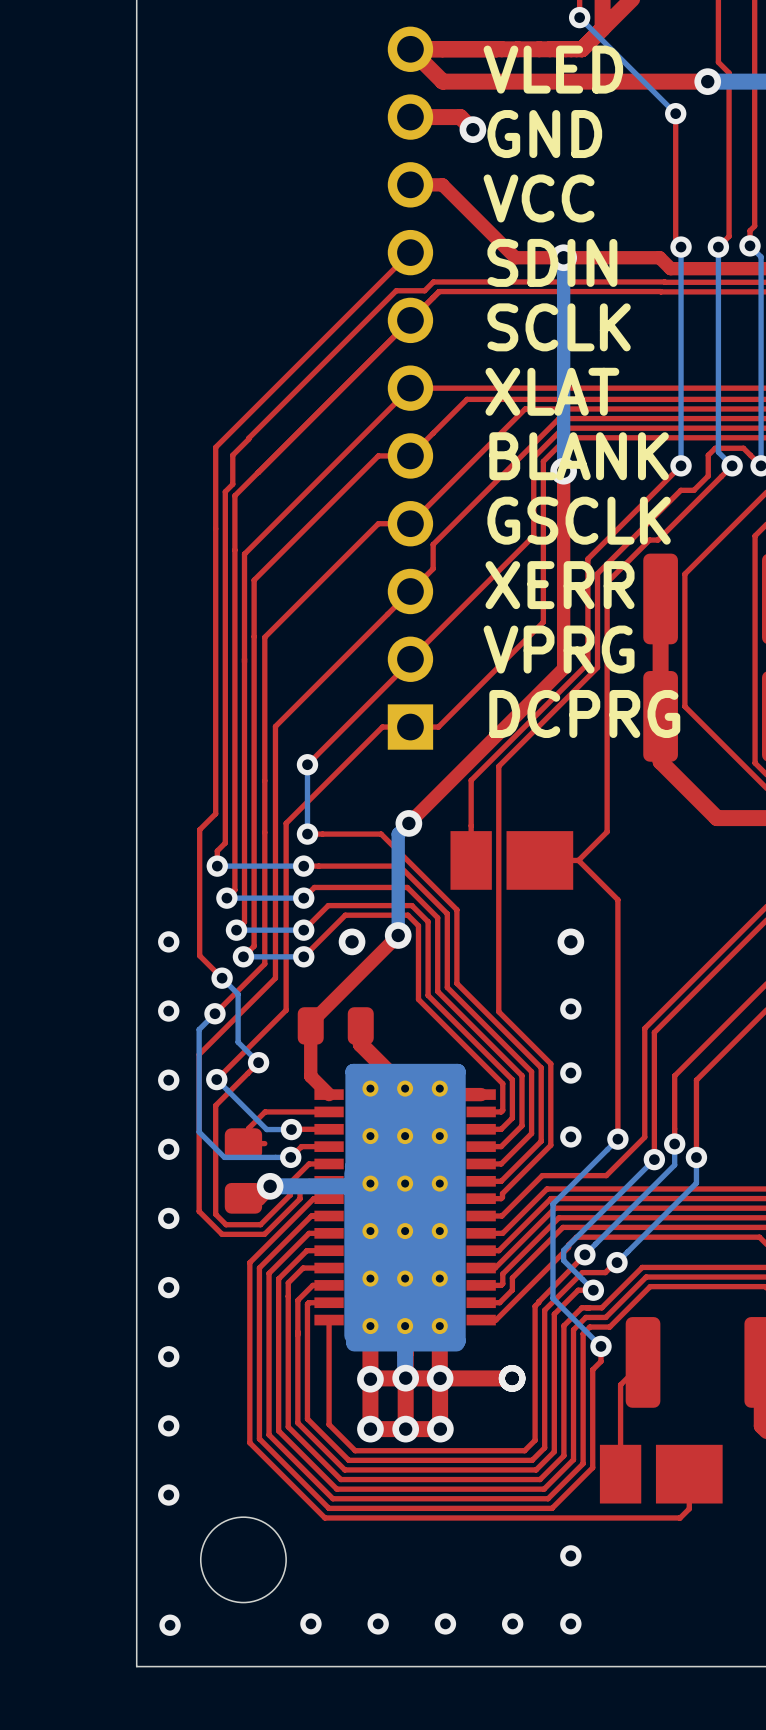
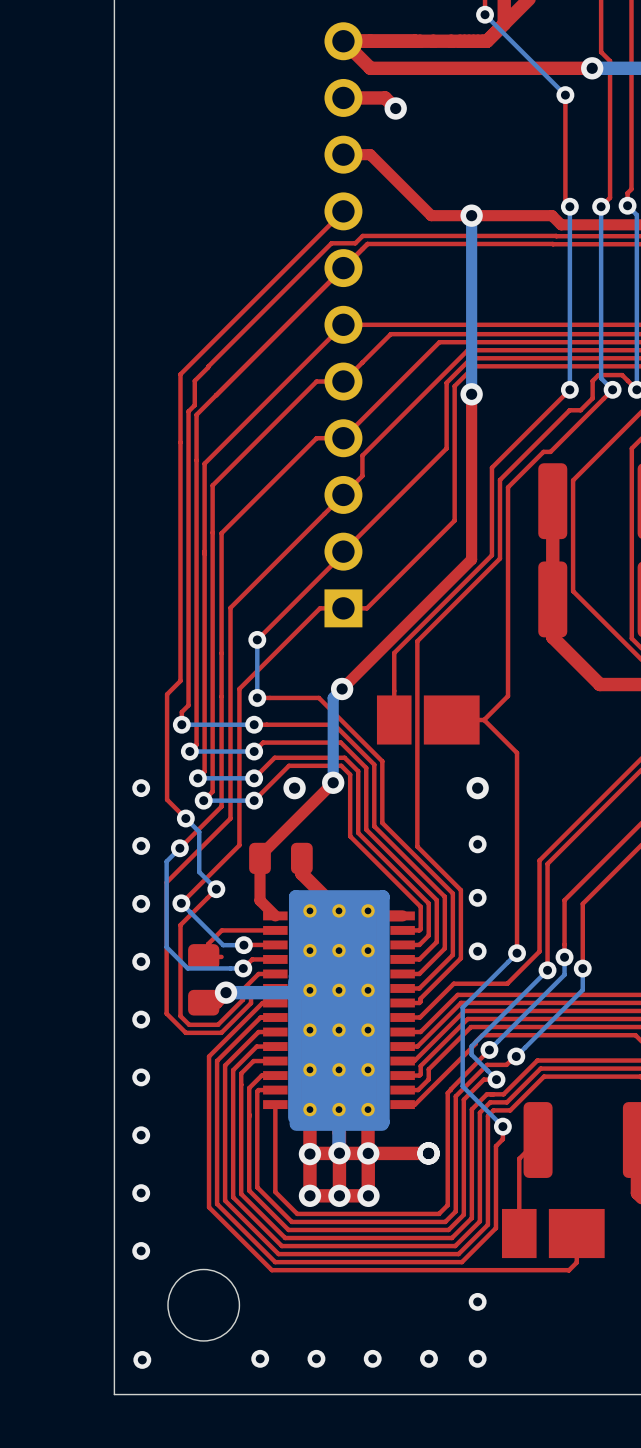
text: VLED (553, 69) -> none
text: GND (544, 134) -> none
text: VCC (539, 198) -> none
text: SDIN (552, 262) -> none
text: SCLK (559, 327) -> none
text: XLAT (552, 391) -> none
text: BLANK (579, 456) -> none
text: GSCLK (579, 520) -> none
text: XERR (560, 585) -> none
text: VPRG (559, 649) -> none
text: DCPRG (584, 713) -> none

